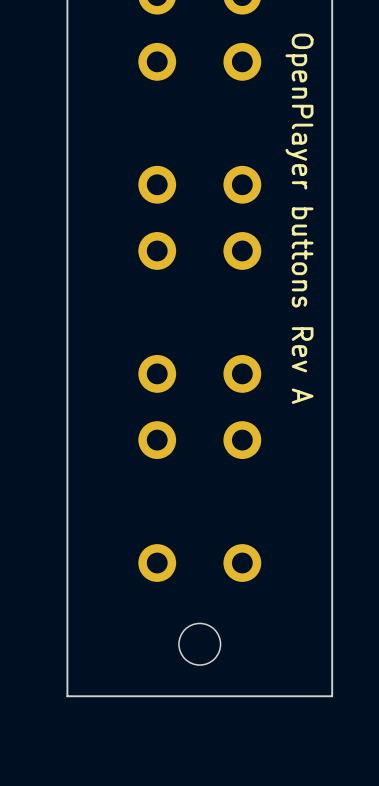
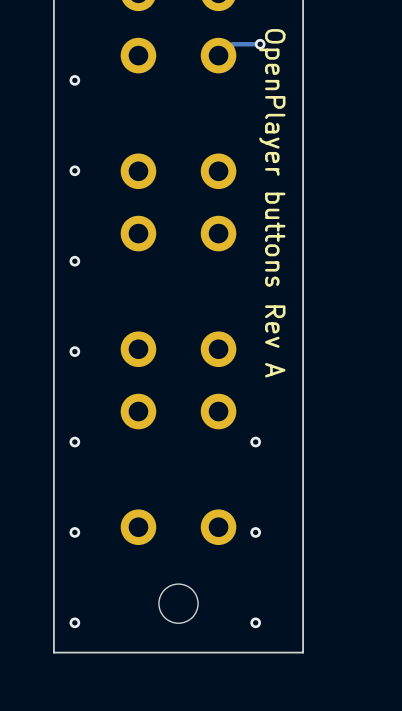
track: none -> (260, 44) (233, 44) (218, 55)
via: none -> (260, 44)
via: none -> (74, 80)
via: none -> (74, 170)
via: none -> (74, 261)
via: none -> (74, 351)
via: none -> (74, 442)
via: none -> (255, 442)
via: none -> (74, 532)
via: none -> (255, 532)
via: none -> (74, 622)
via: none -> (255, 622)

